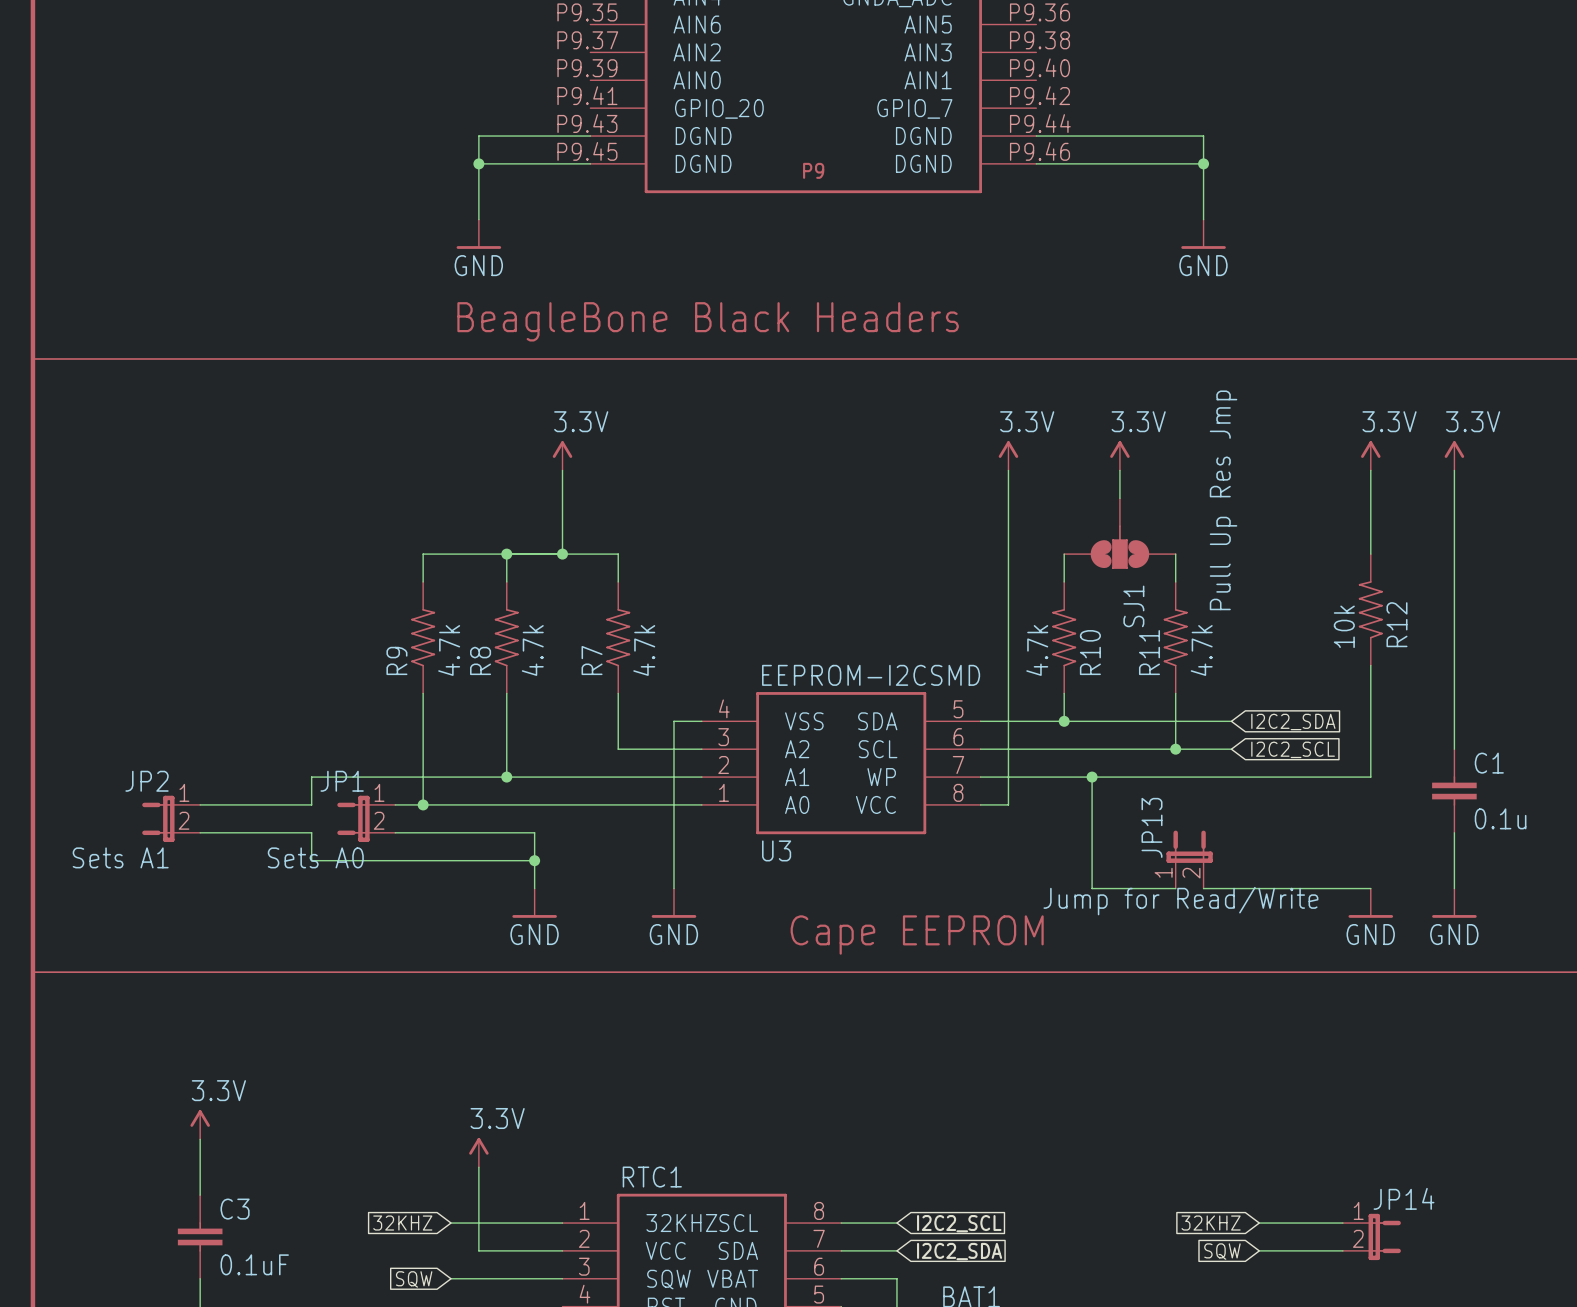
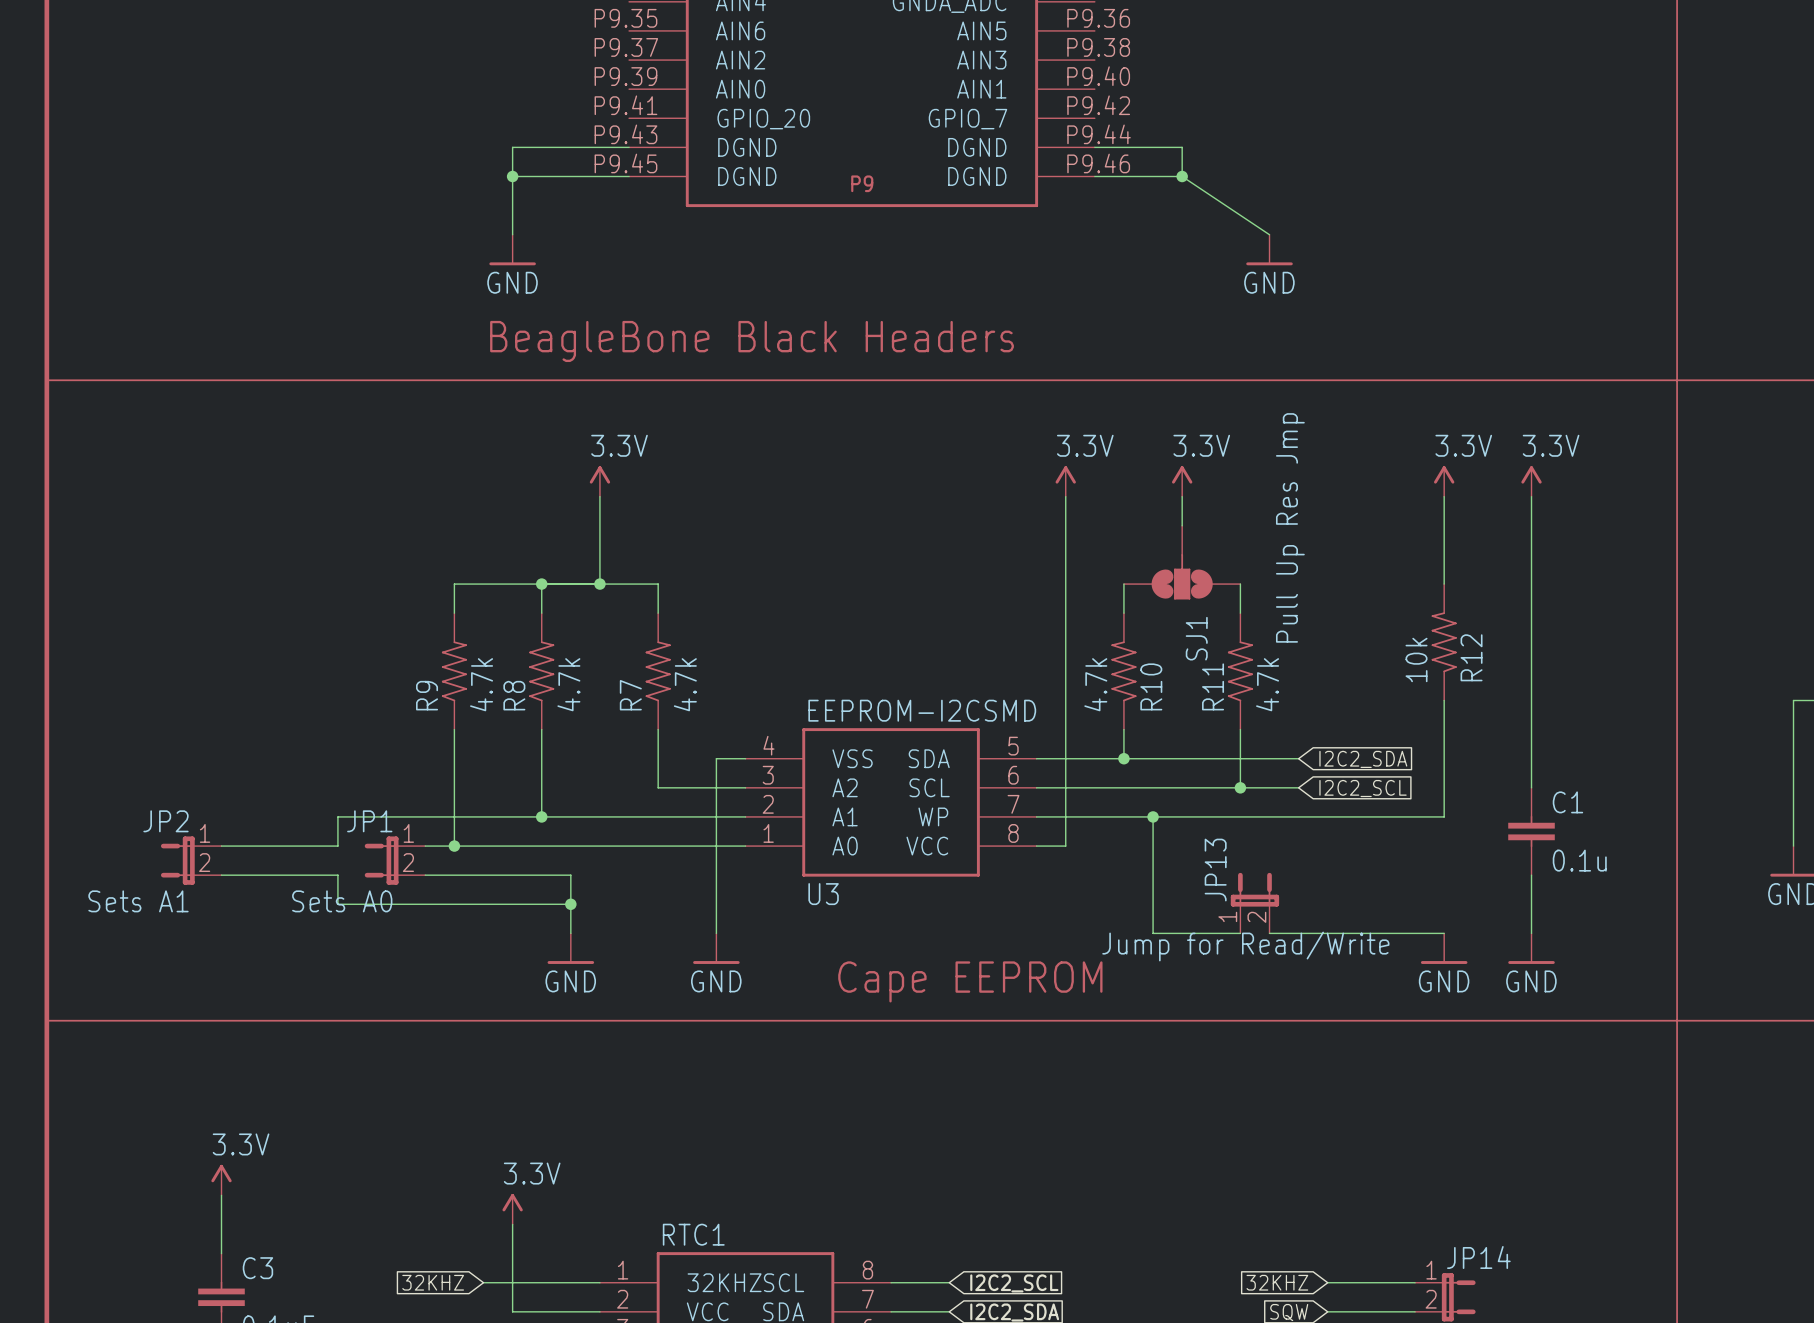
wire: (1119, 136) (1203, 136) (1203, 219) -> (1182, 147) (1182, 176) (1269, 234)
wire: (1119, 163) (1203, 163) -> none
junction: none -> (1182, 176)
junction: (1203, 163) -> none

